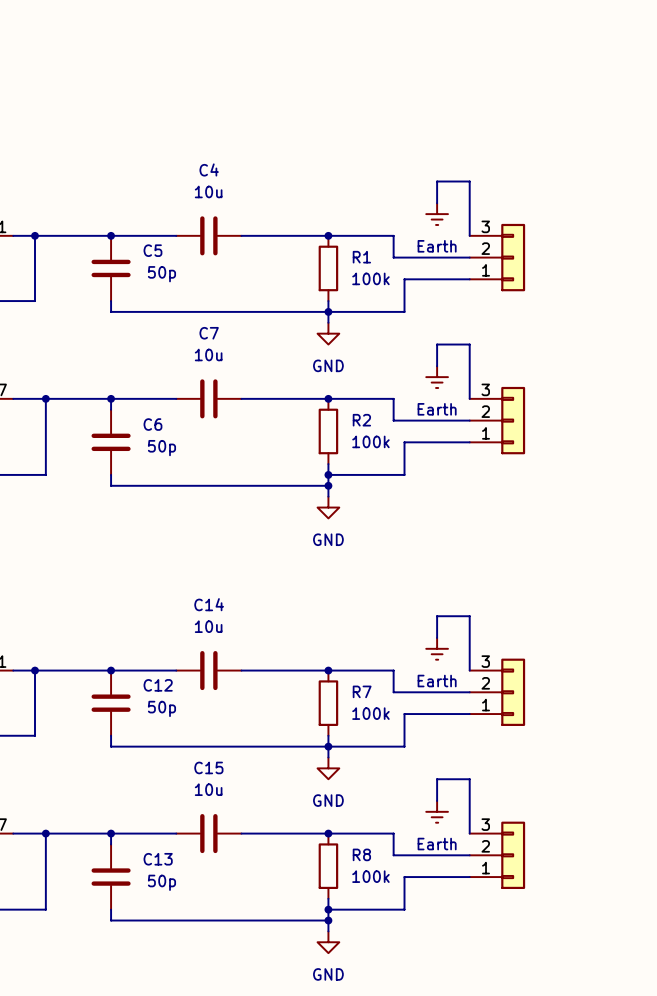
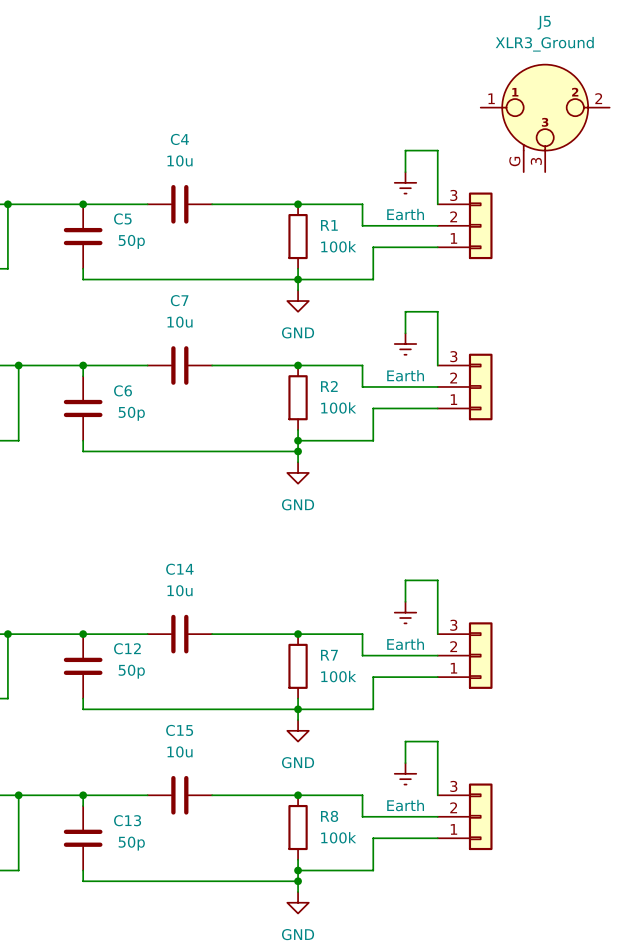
J5: none -> XLR3_Ground (545, 118)

